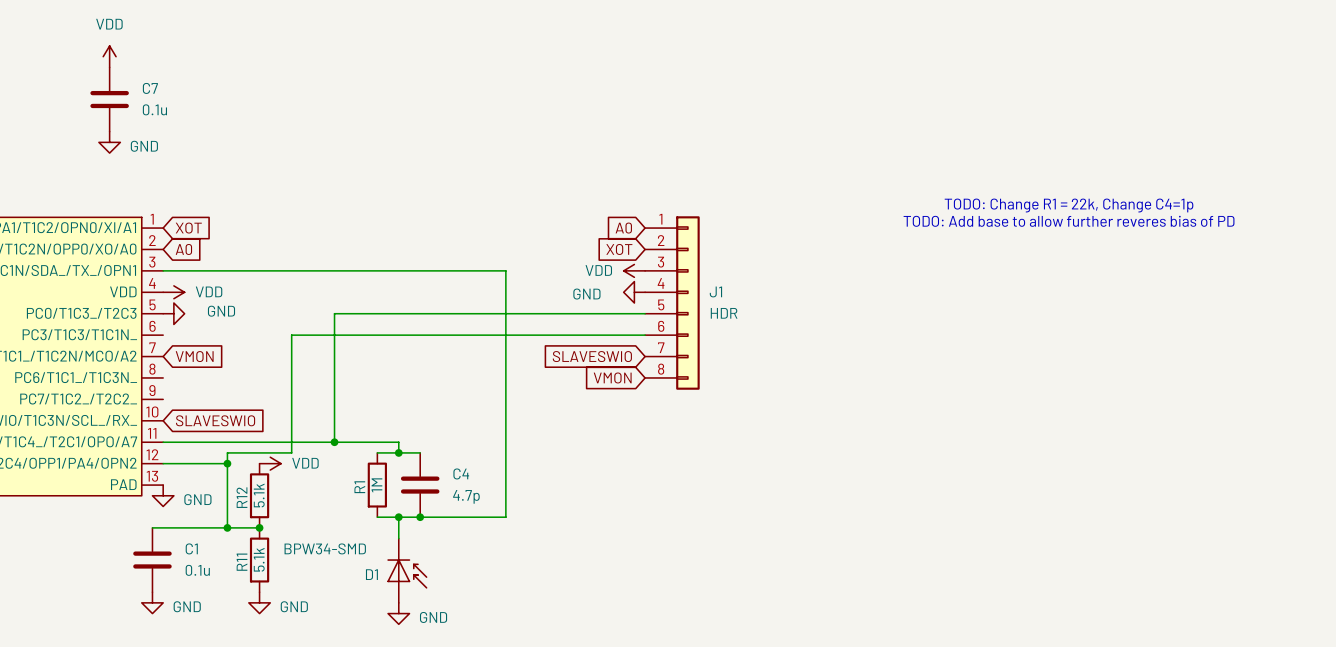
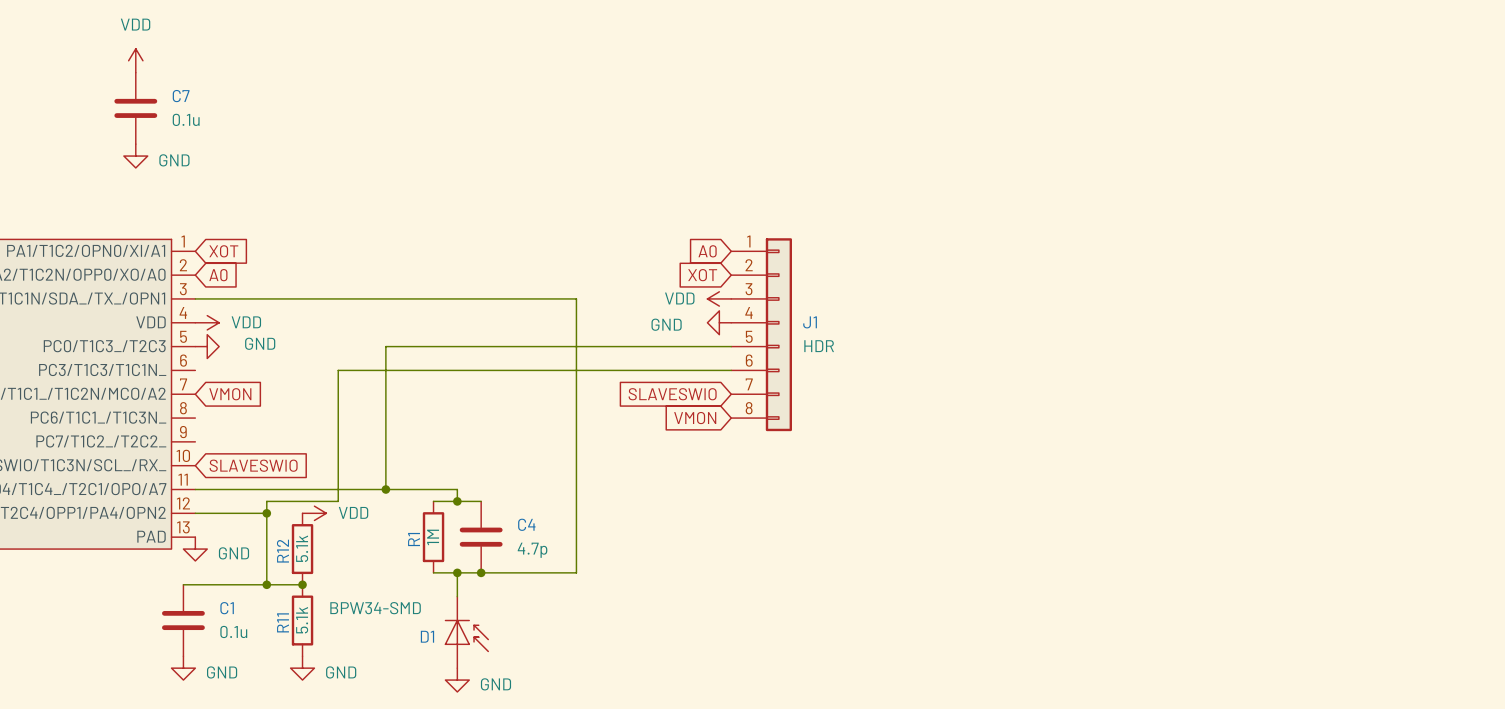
text: TODO: Change R1 = 22k, Change C4=1p (1069, 205) -> none
text: TODO: Add base to allow further reveres bias of PD (1069, 221) -> none

